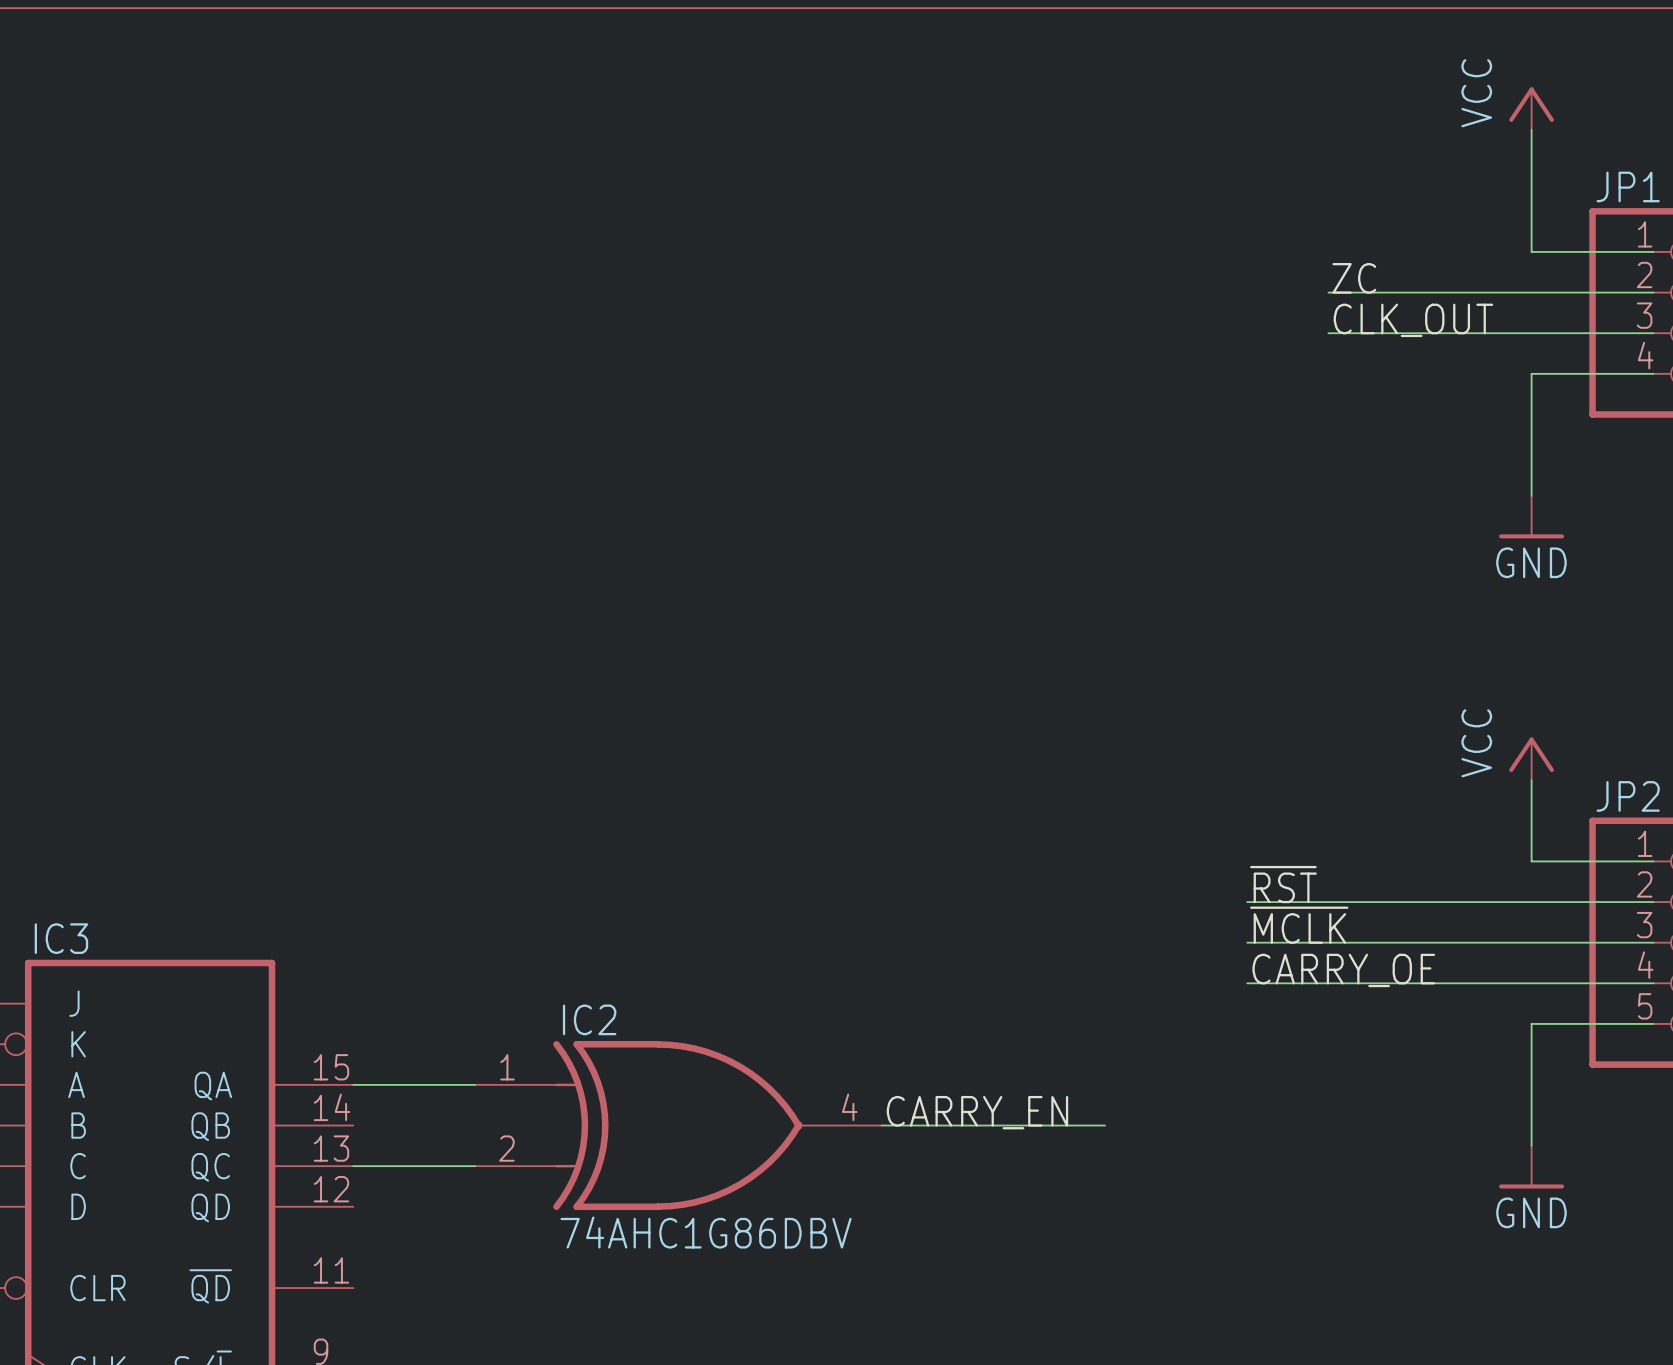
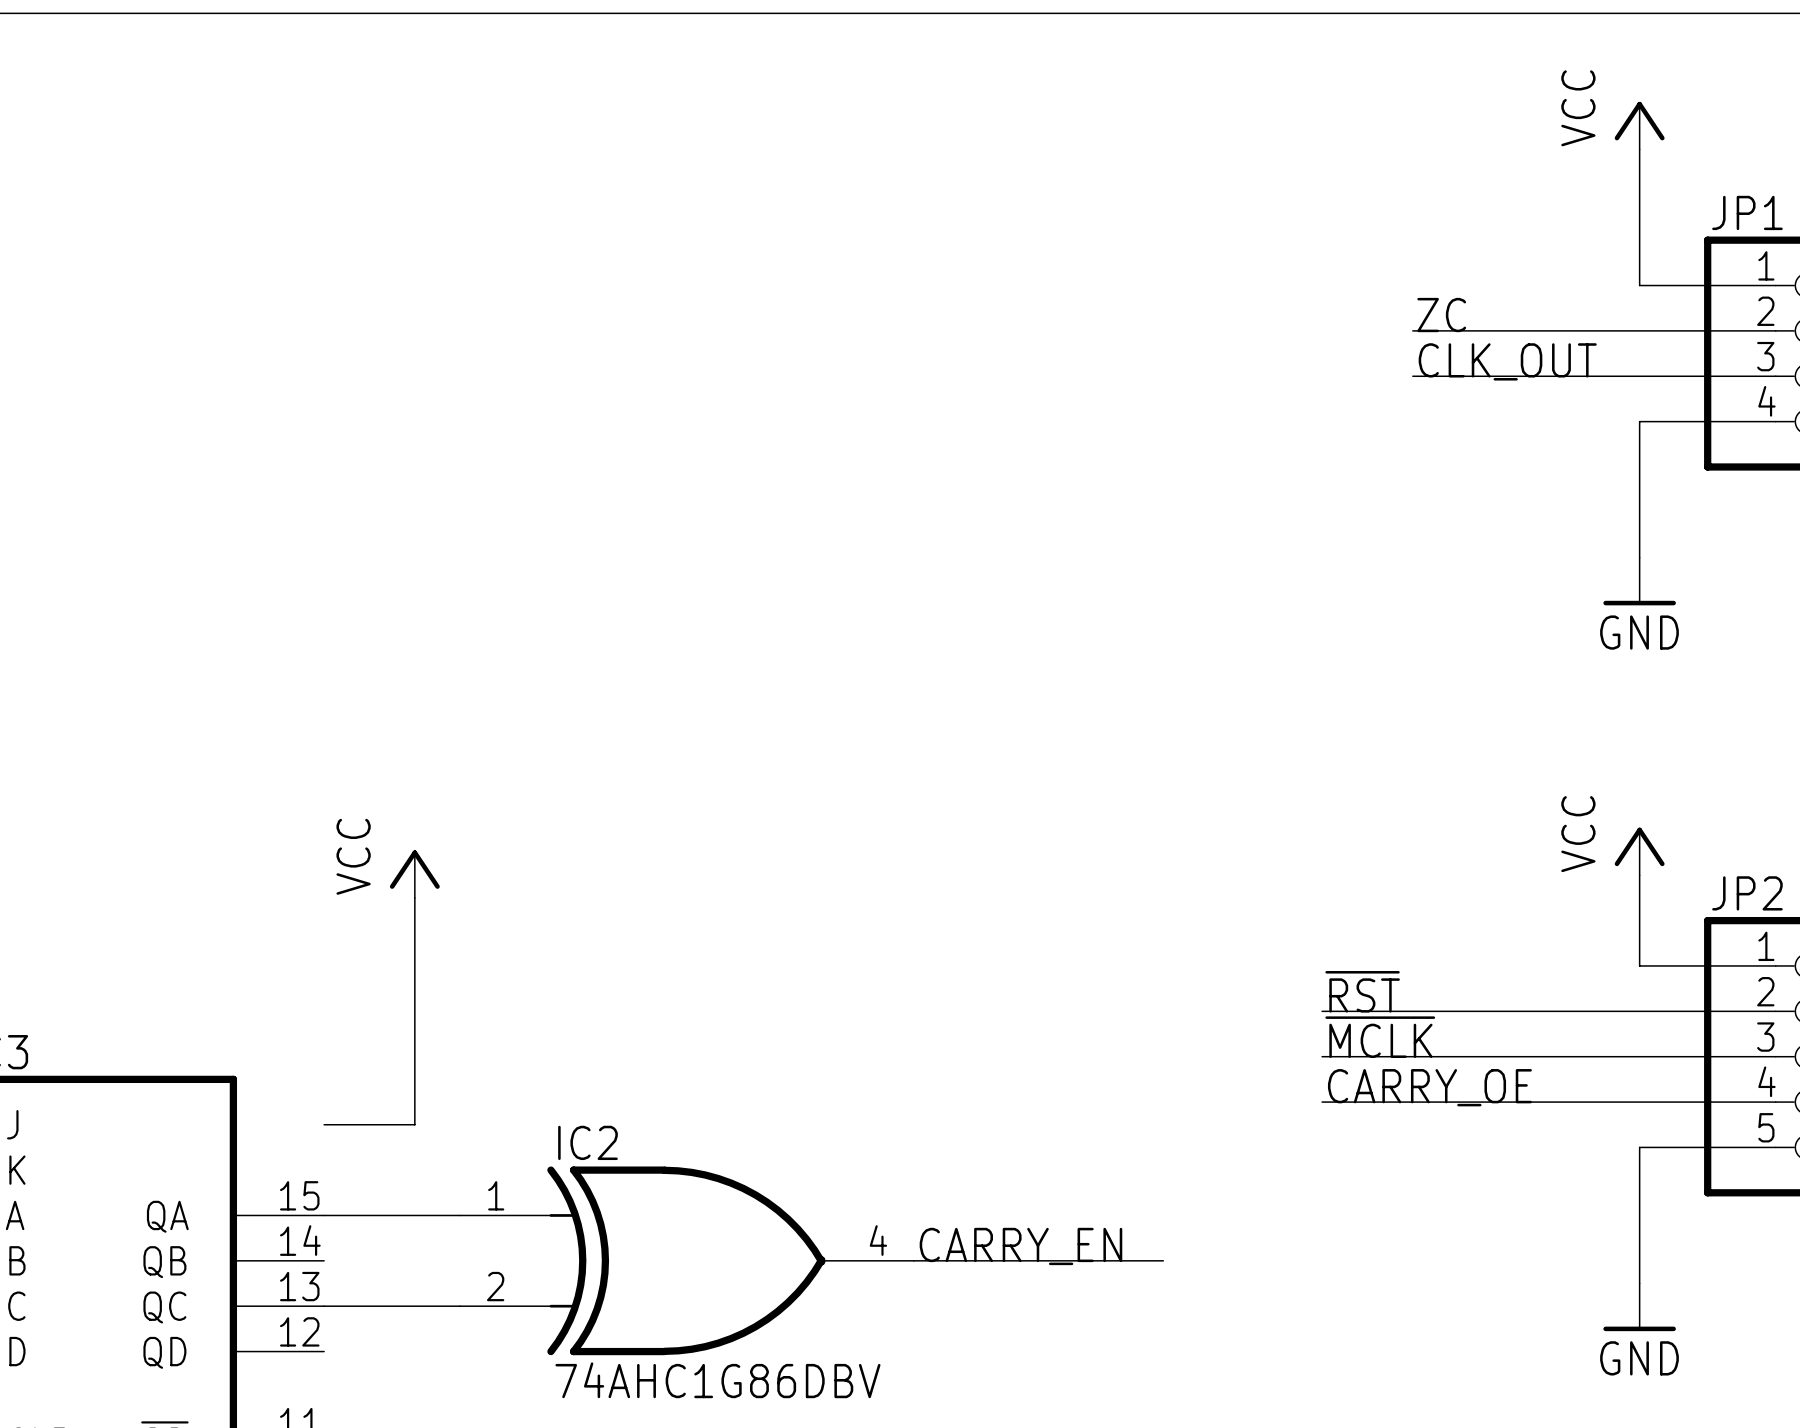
power symbol: none -> VCC (414, 874)
wire: none -> (414, 897) (414, 1124) (324, 1124)

